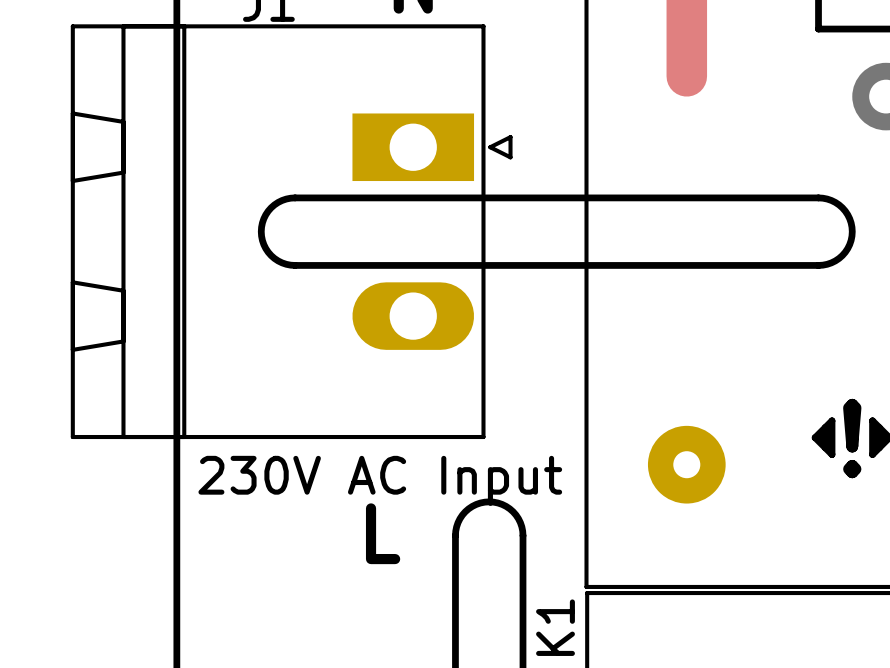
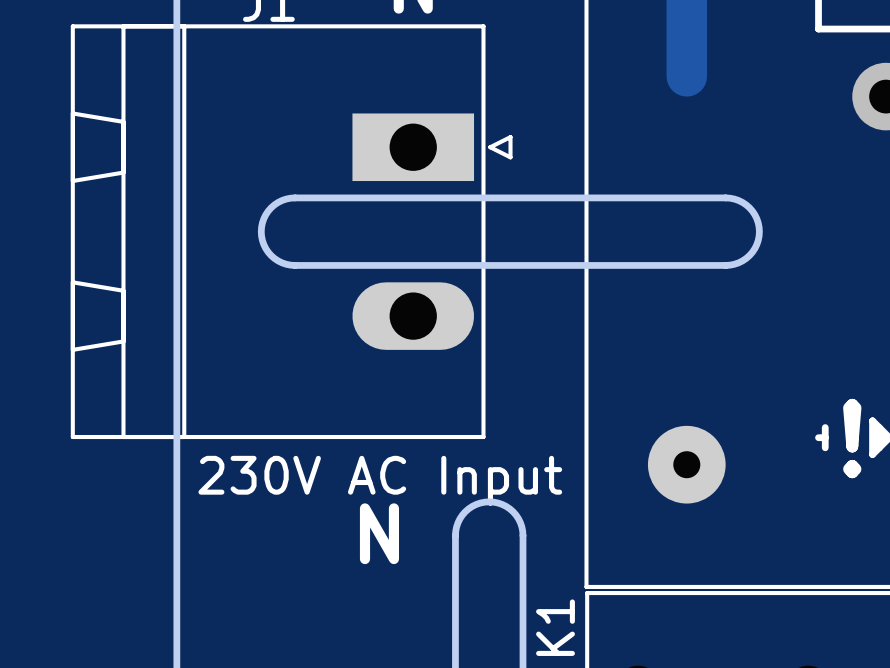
board edge: (725, 197) (827, 199) (835, 202) (845, 211) (849, 218) (852, 231) (849, 244) (845, 252) (835, 260) (827, 264) (725, 265) -> (725, 197) (738, 200) (749, 207) (756, 218) (759, 231) (756, 244) (749, 255) (738, 262) (725, 265)
line: (832, 420) (815, 437) (832, 454) (832, 420) -> none
text: L (383, 533) -> N (379, 533)

